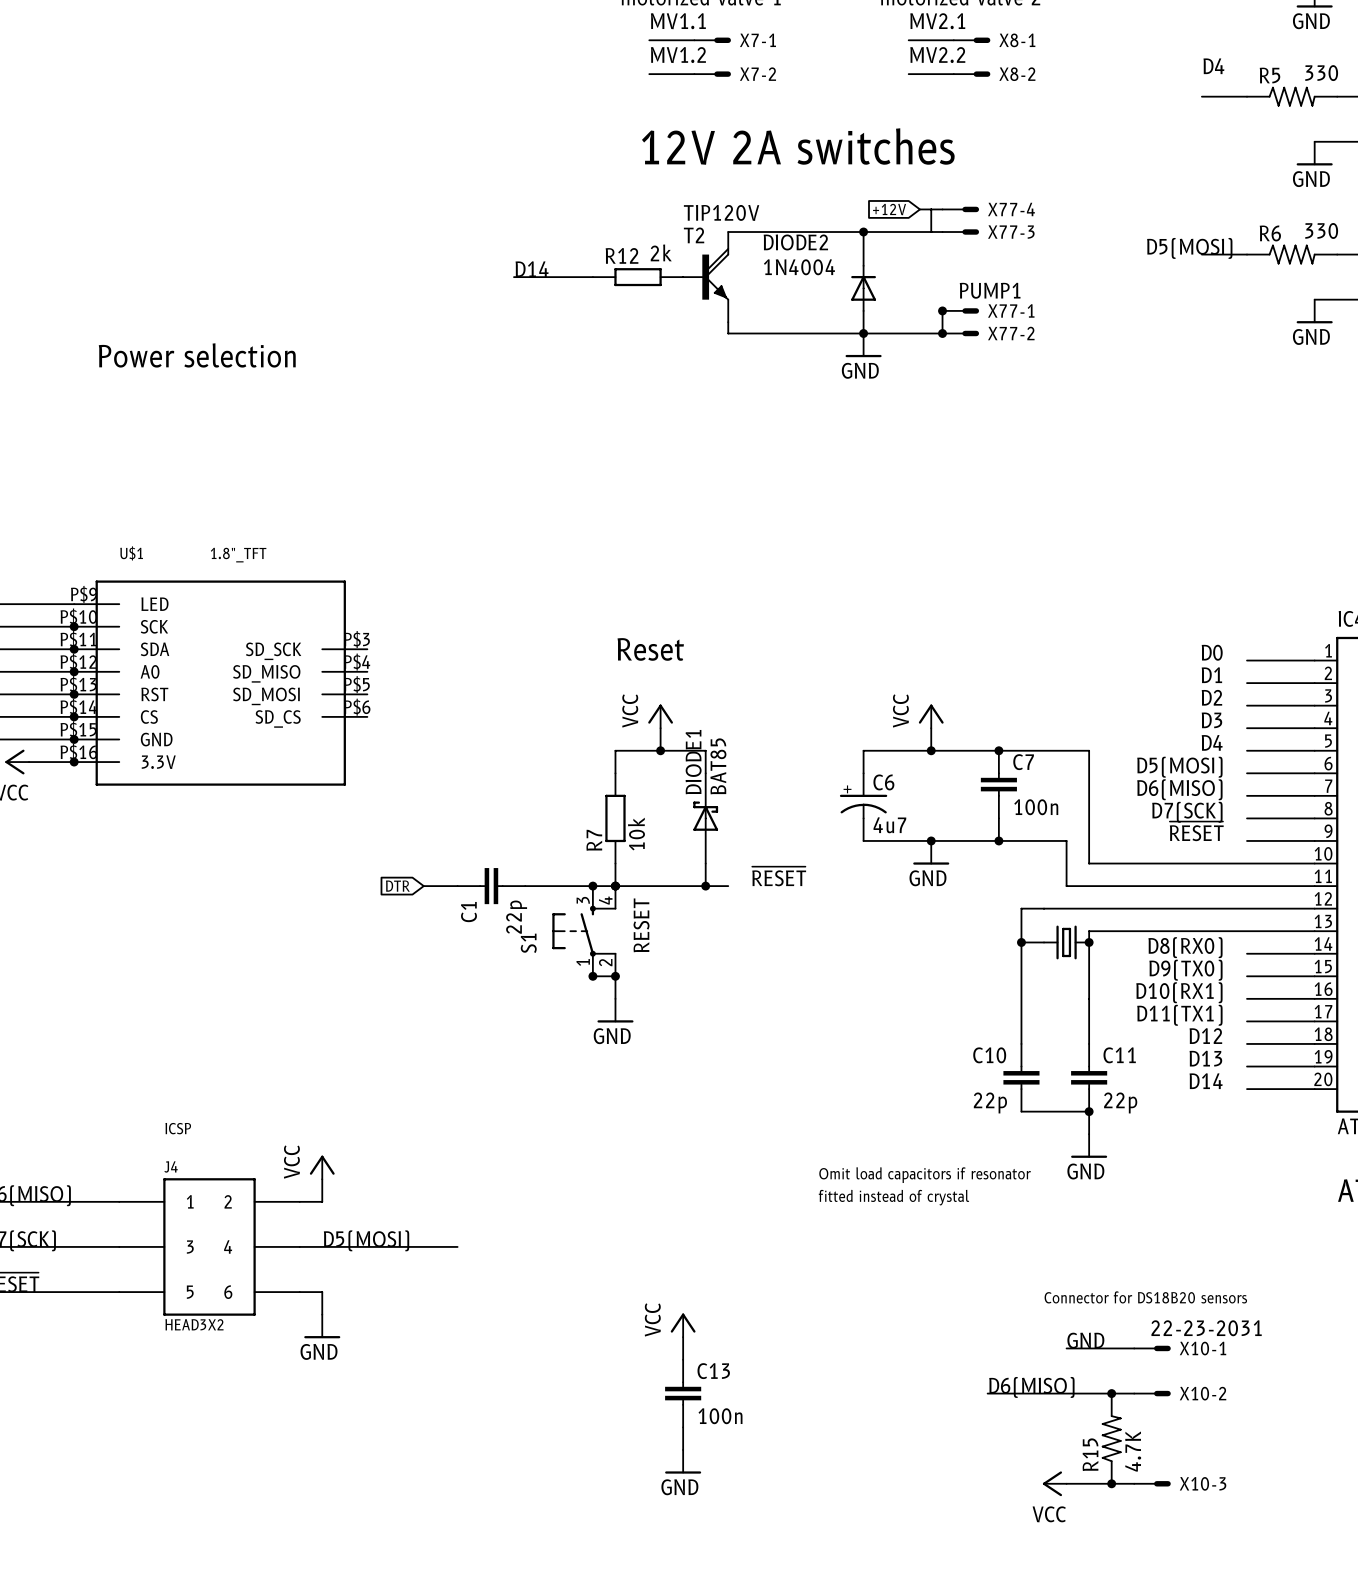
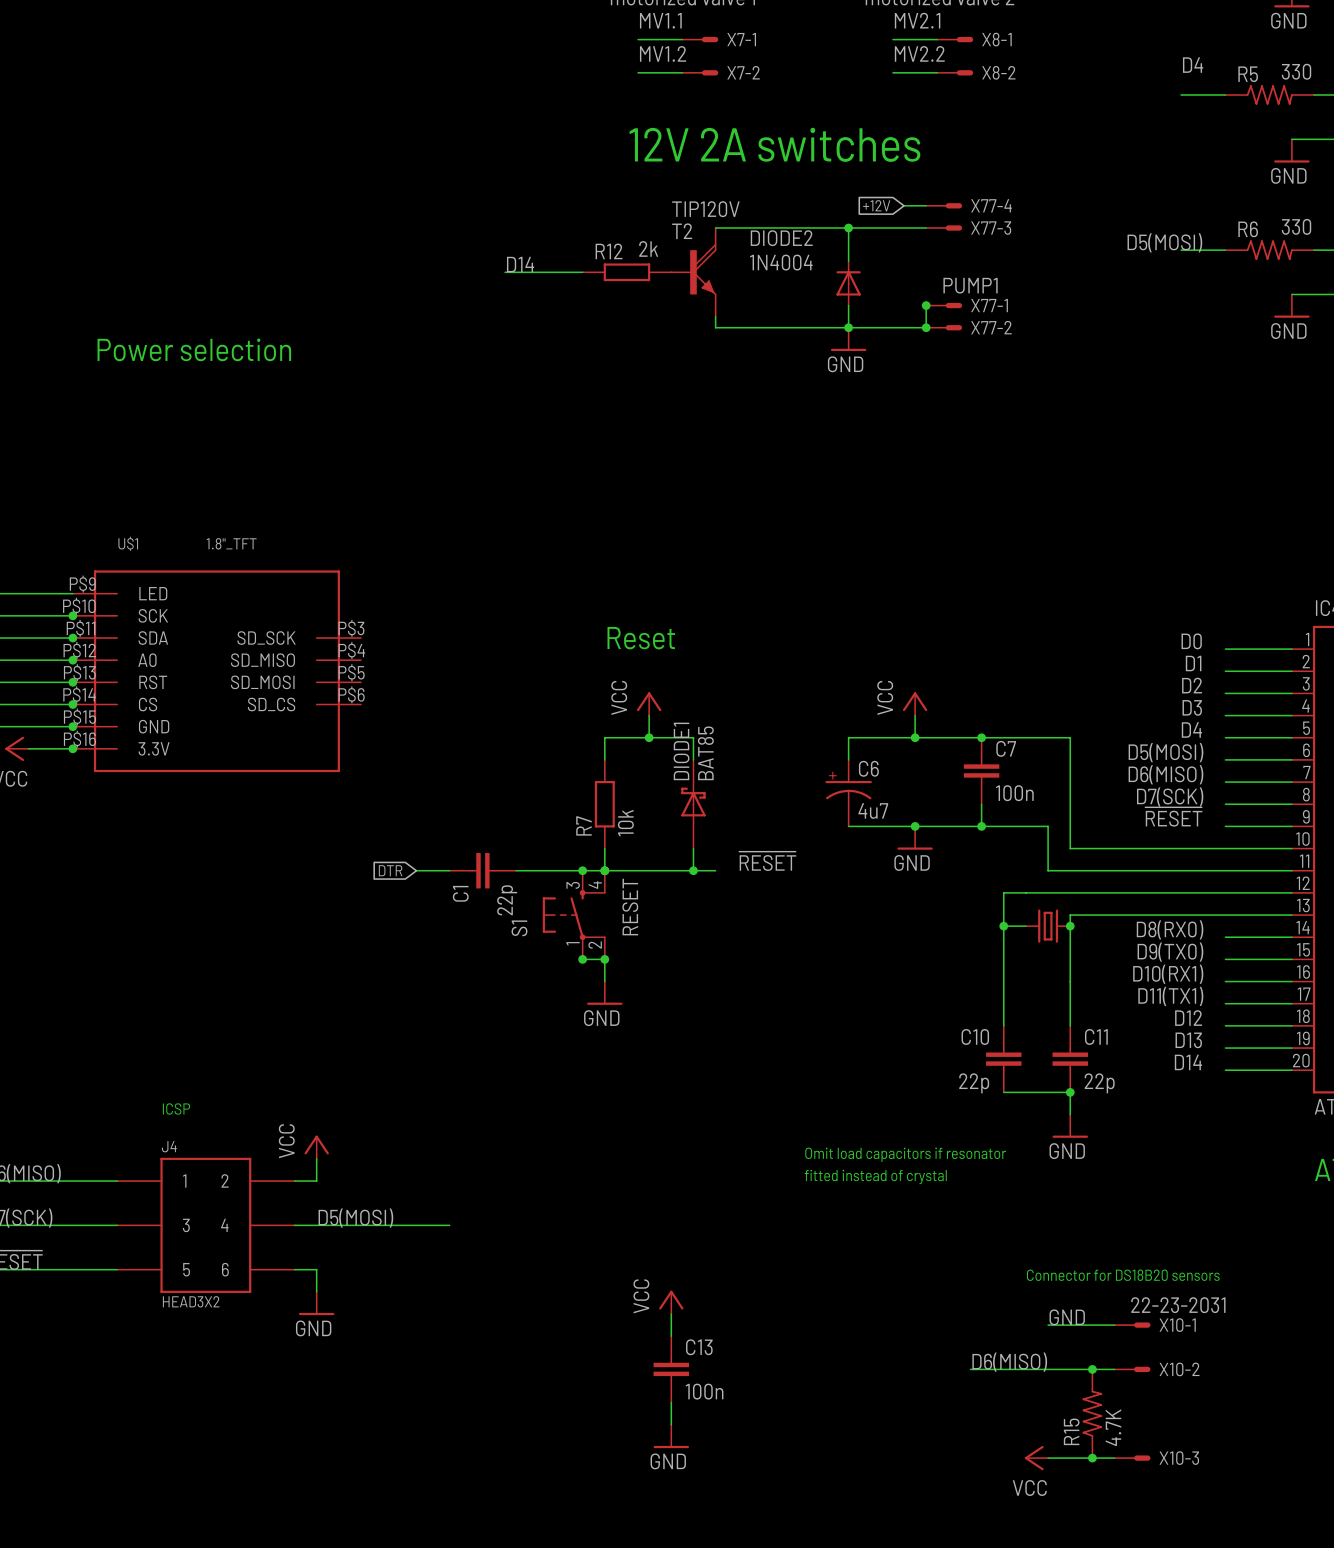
wire: (931, 209) (931, 232) -> none

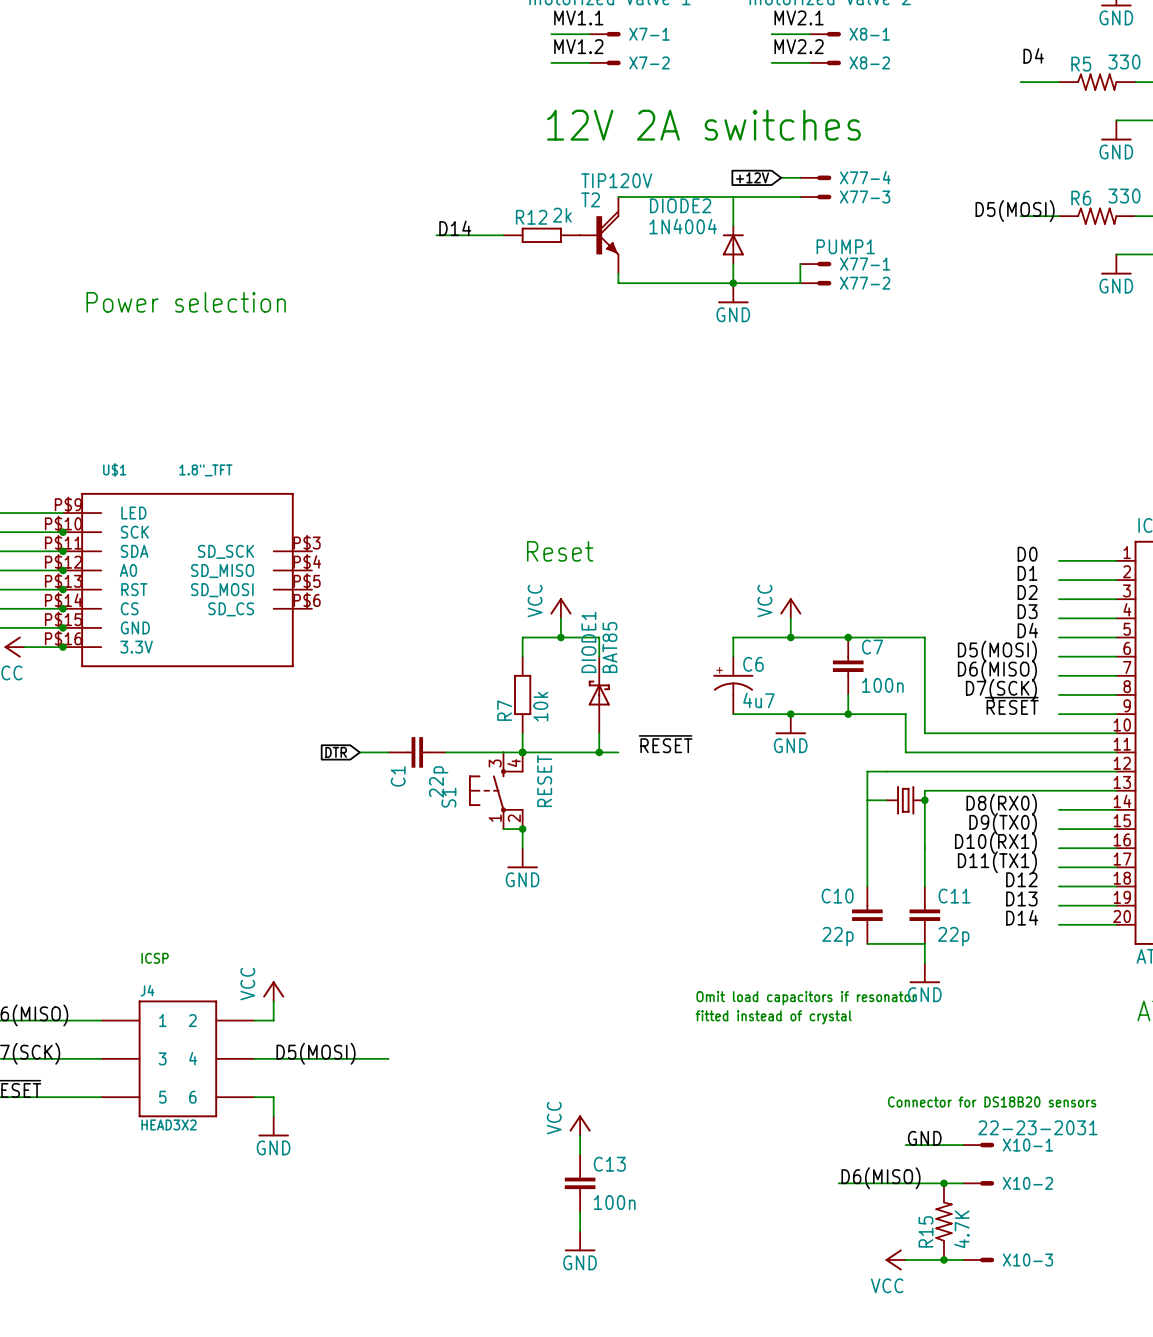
junction: (848, 227) -> none
junction: (926, 305) -> none
junction: (926, 327) -> none
junction: (582, 870) -> none
junction: (1003, 926) -> none
junction: (582, 959) -> none
junction: (1070, 1092) -> none

